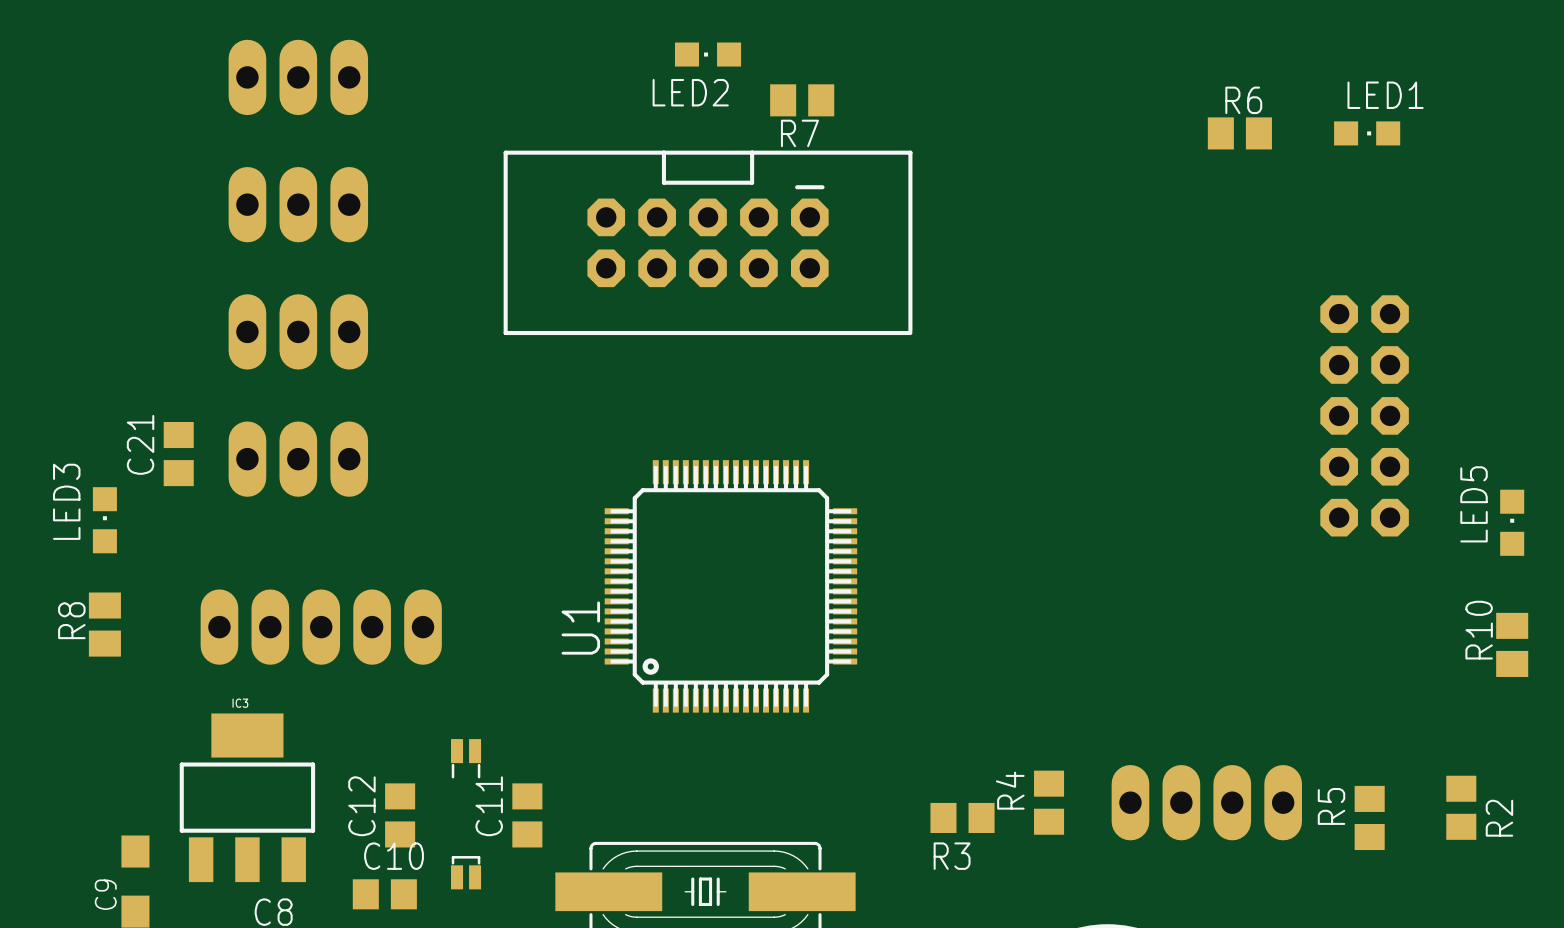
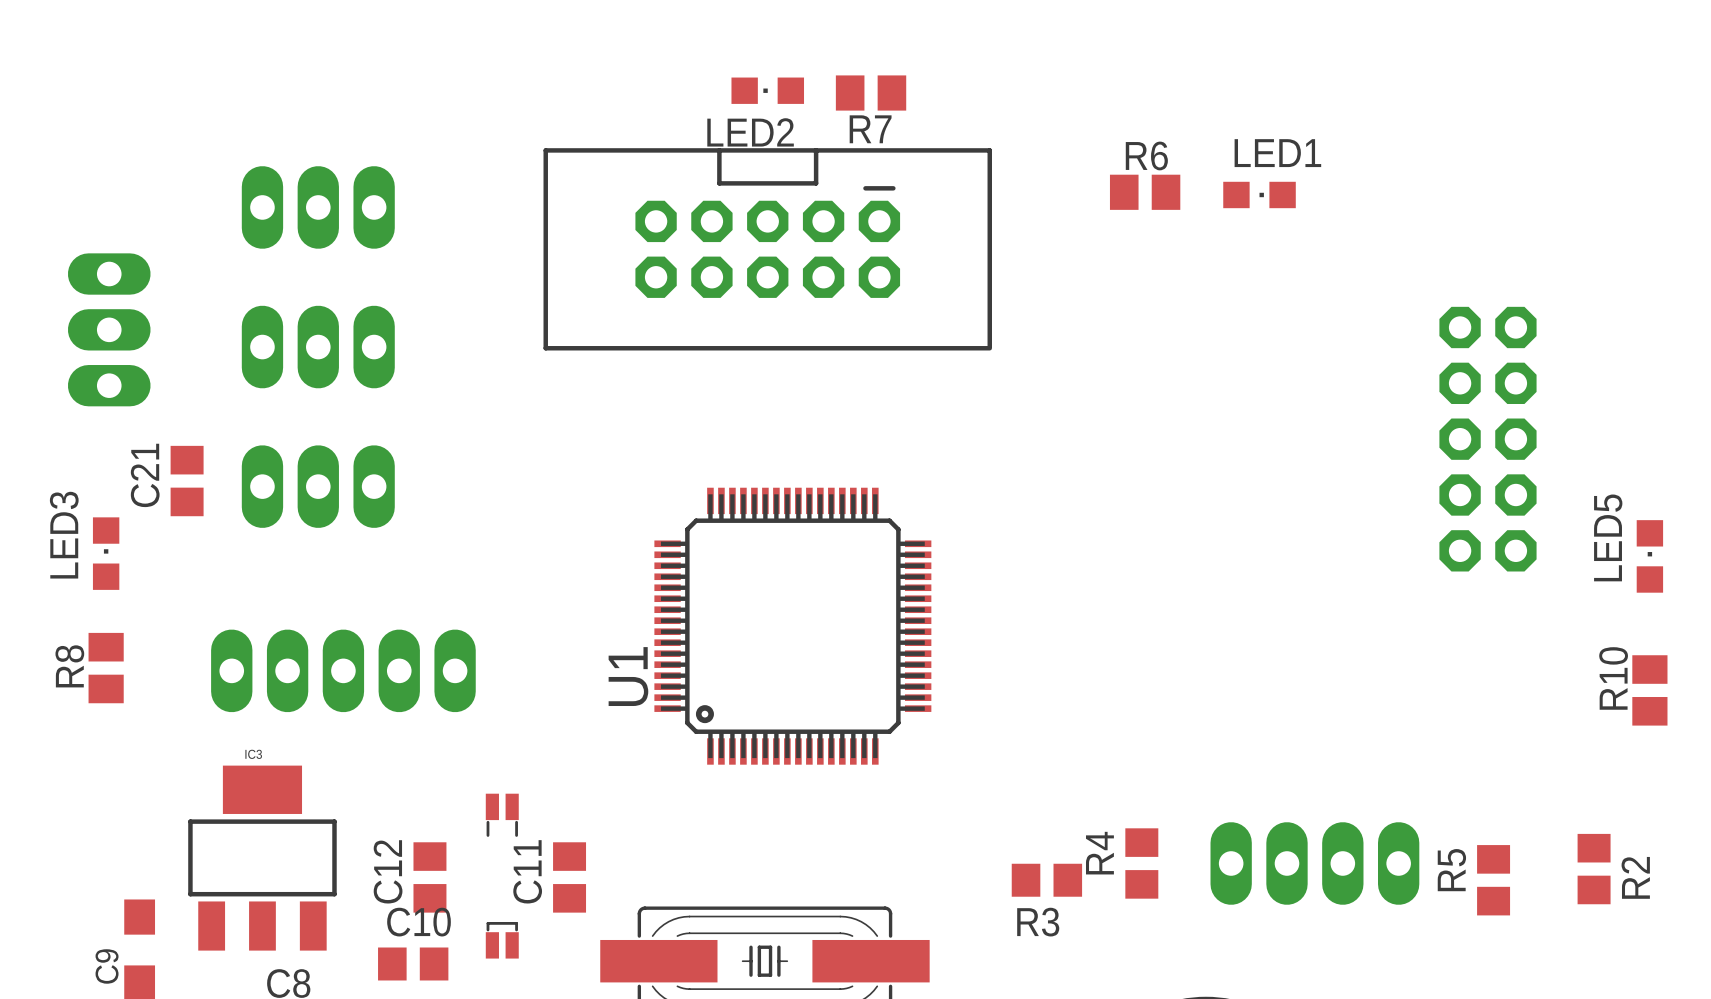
LED2 position: (708, 54) -> (767, 90)
part rotation: 0° (298, 77) -> 90° clockwise (109, 329)
part position: (298, 77) -> (109, 329)
R6 position: (1239, 133) -> (1145, 192)
LED1 position: (1367, 133) -> (1259, 194)

